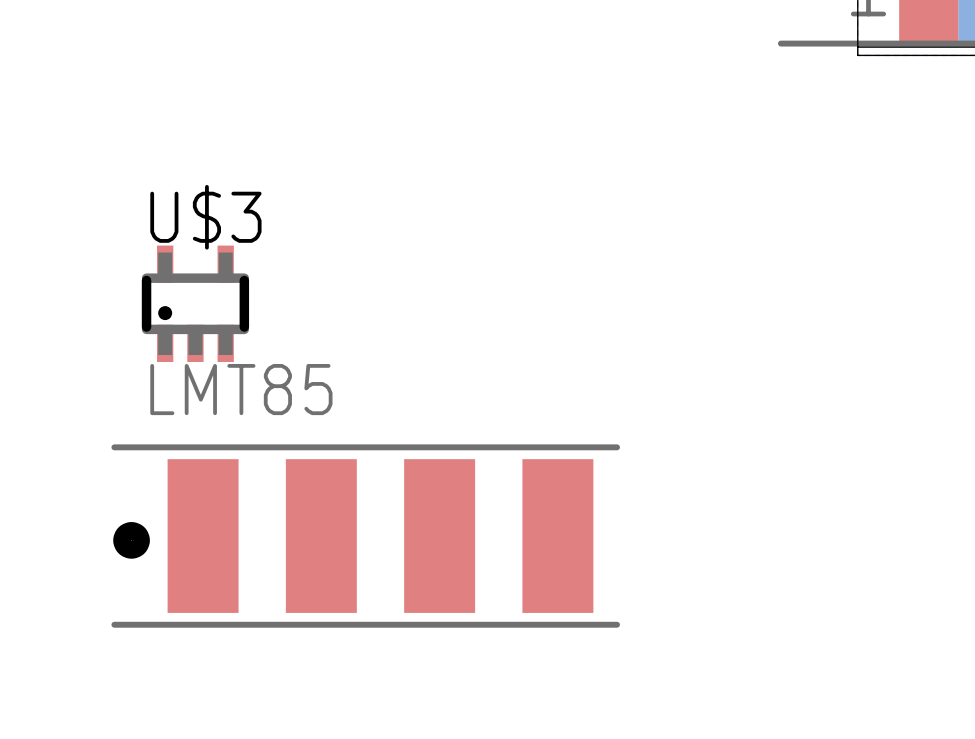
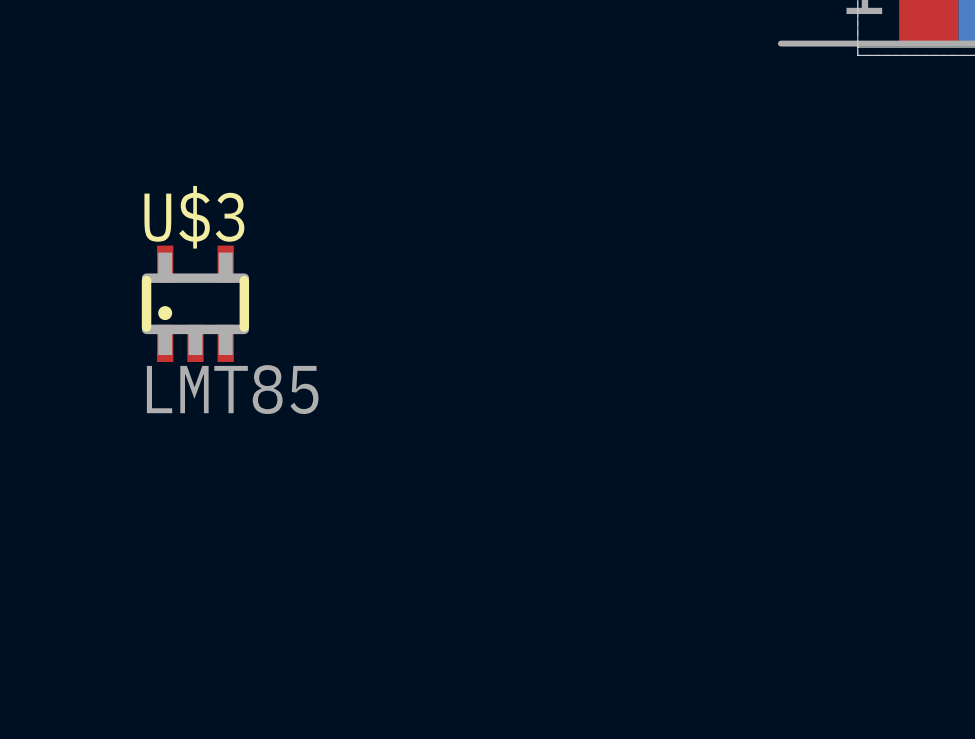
part: (365, 536) -> none

